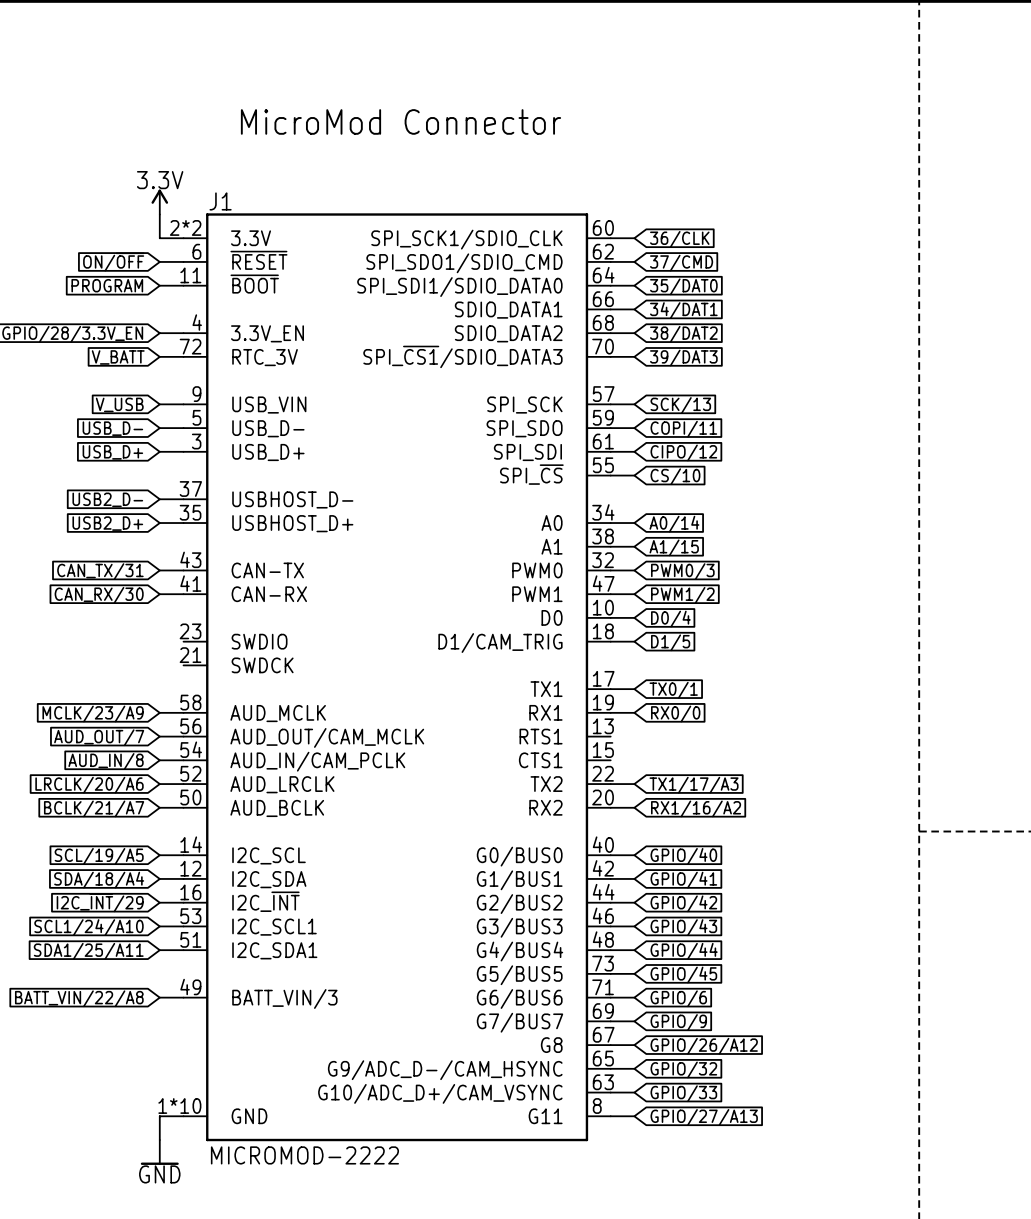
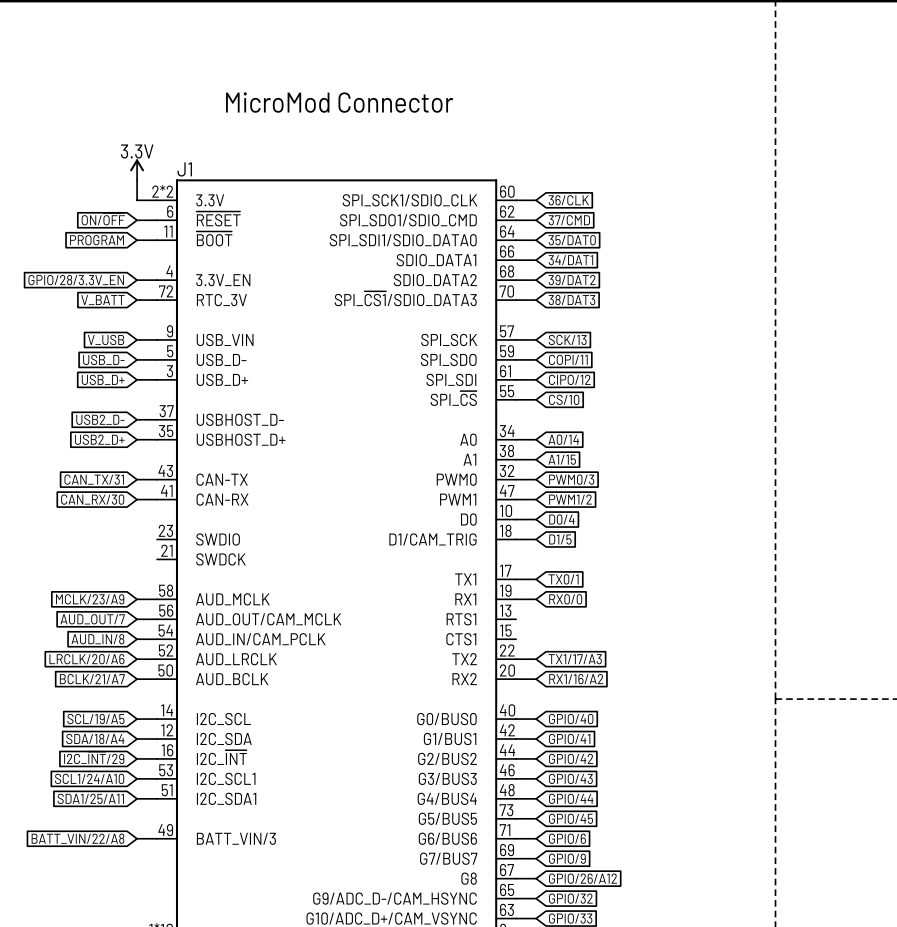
global label: 38/DAT2 (683, 334) -> 39/DAT2 (572, 280)
global label: 39/DAT3 (683, 358) -> 38/DAT3 (571, 300)

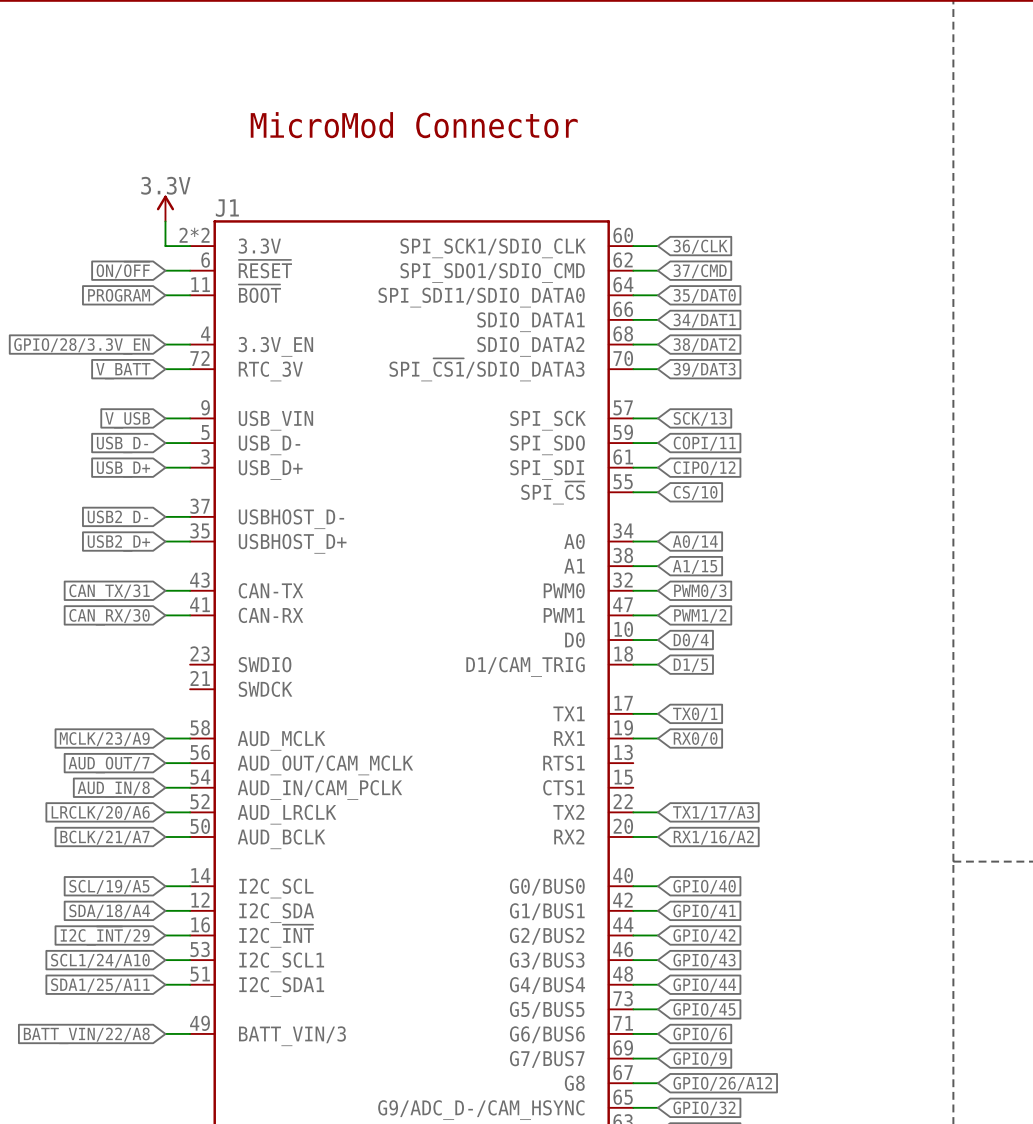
global label: 39/DAT2 (572, 280) -> 38/DAT2 (704, 345)
global label: 38/DAT3 (571, 300) -> 39/DAT3 (704, 369)

